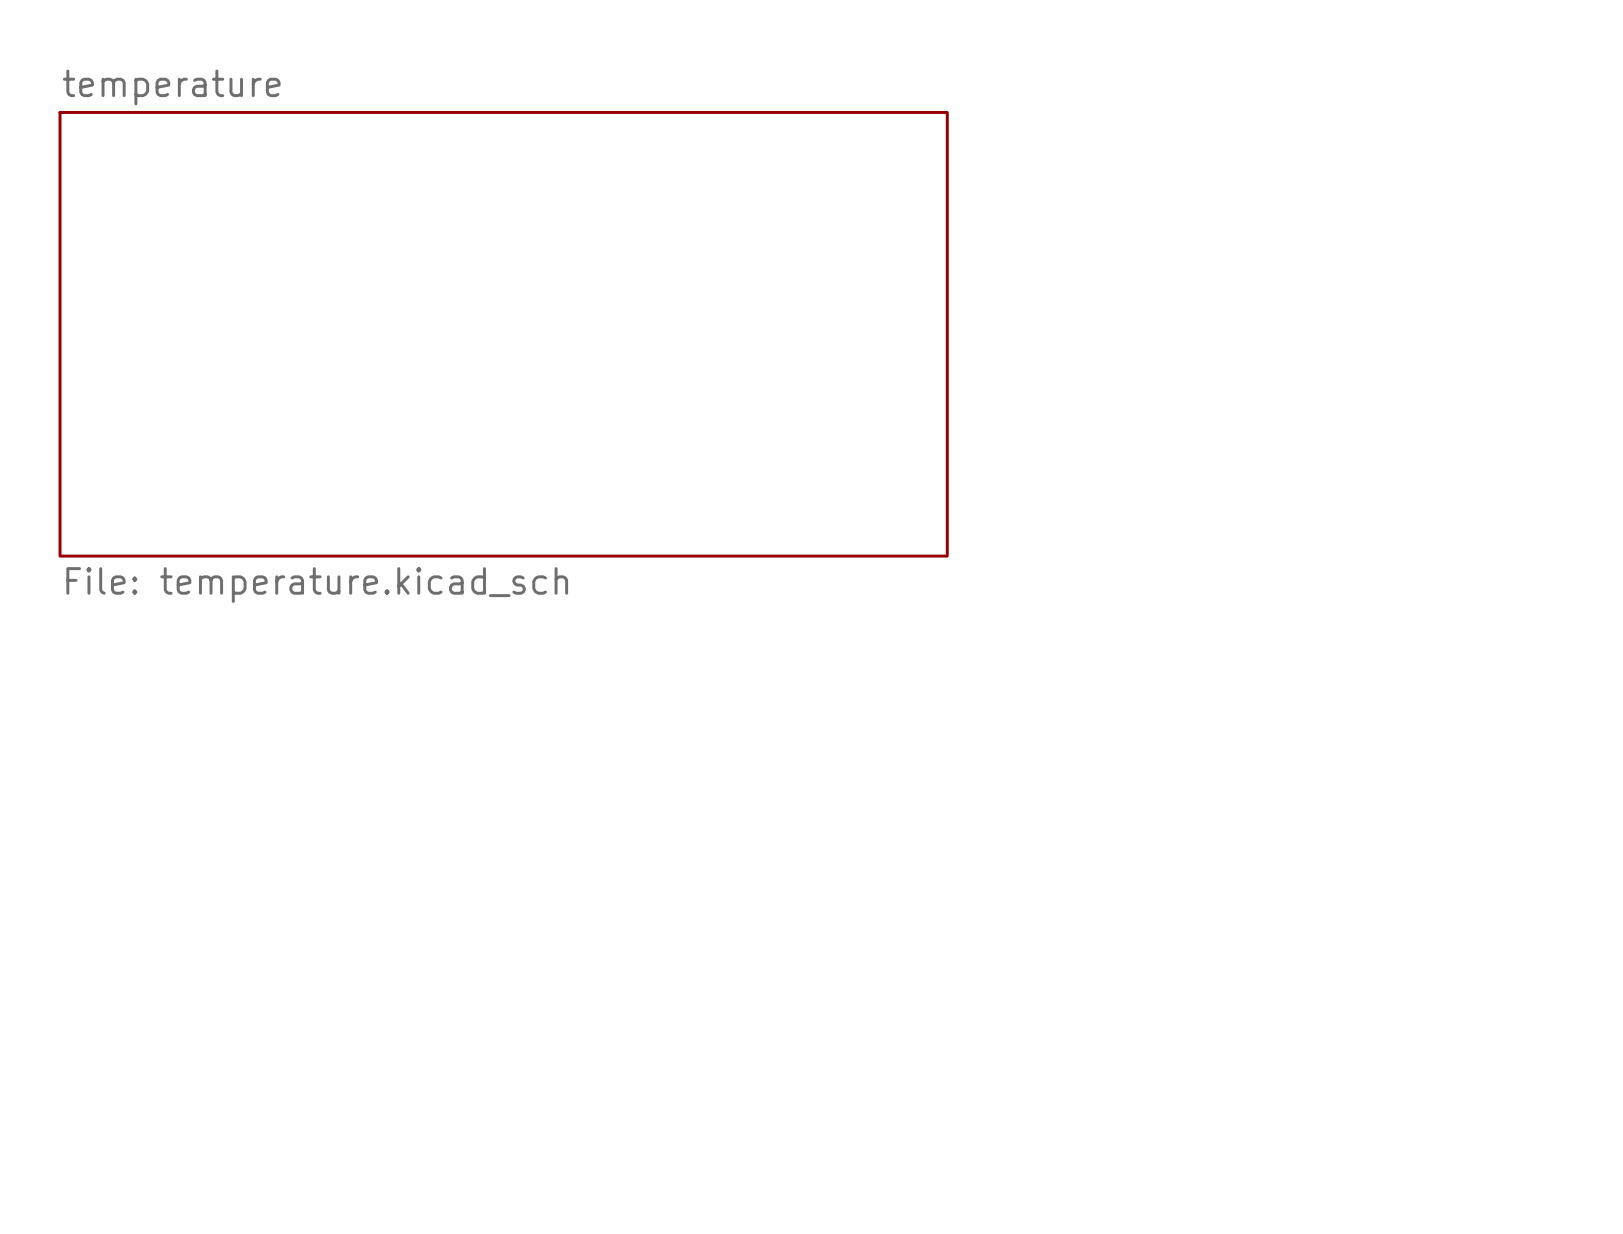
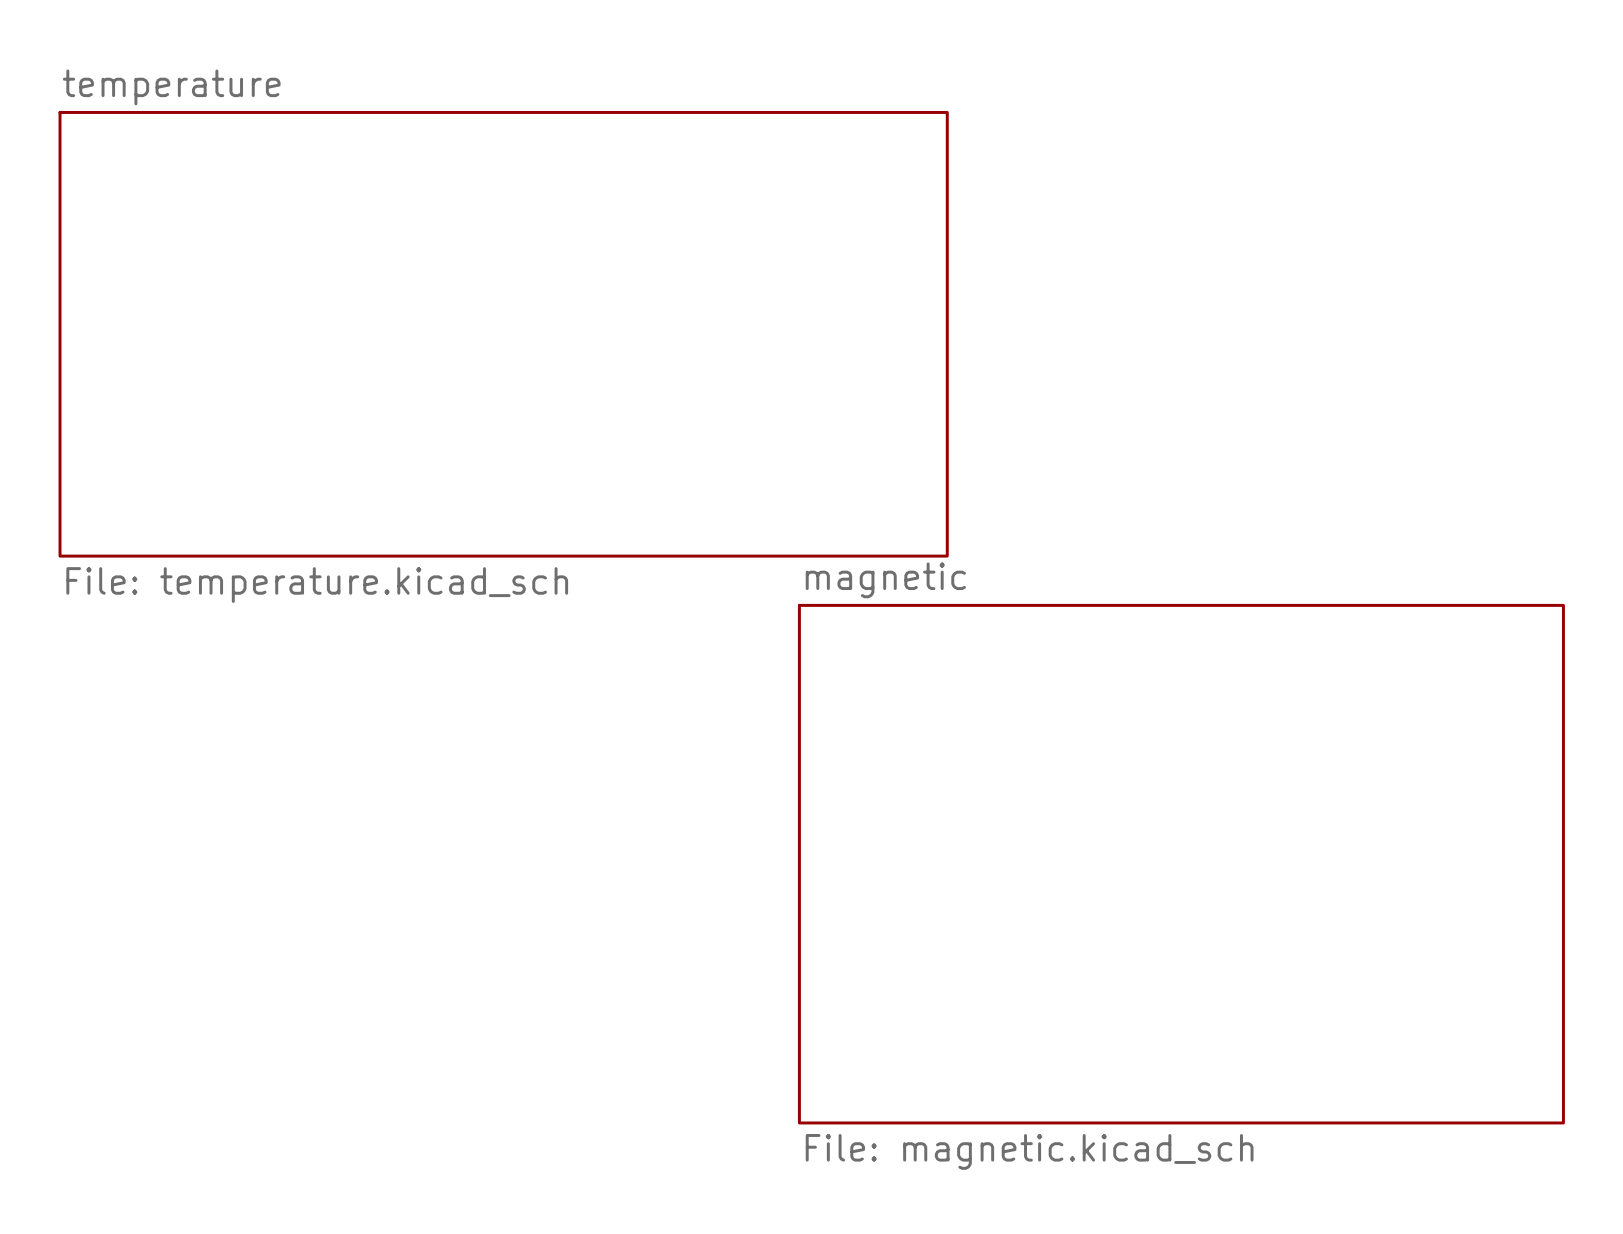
sheet magnetic: none -> File: magnetic.kicad_sch (1181, 864)

